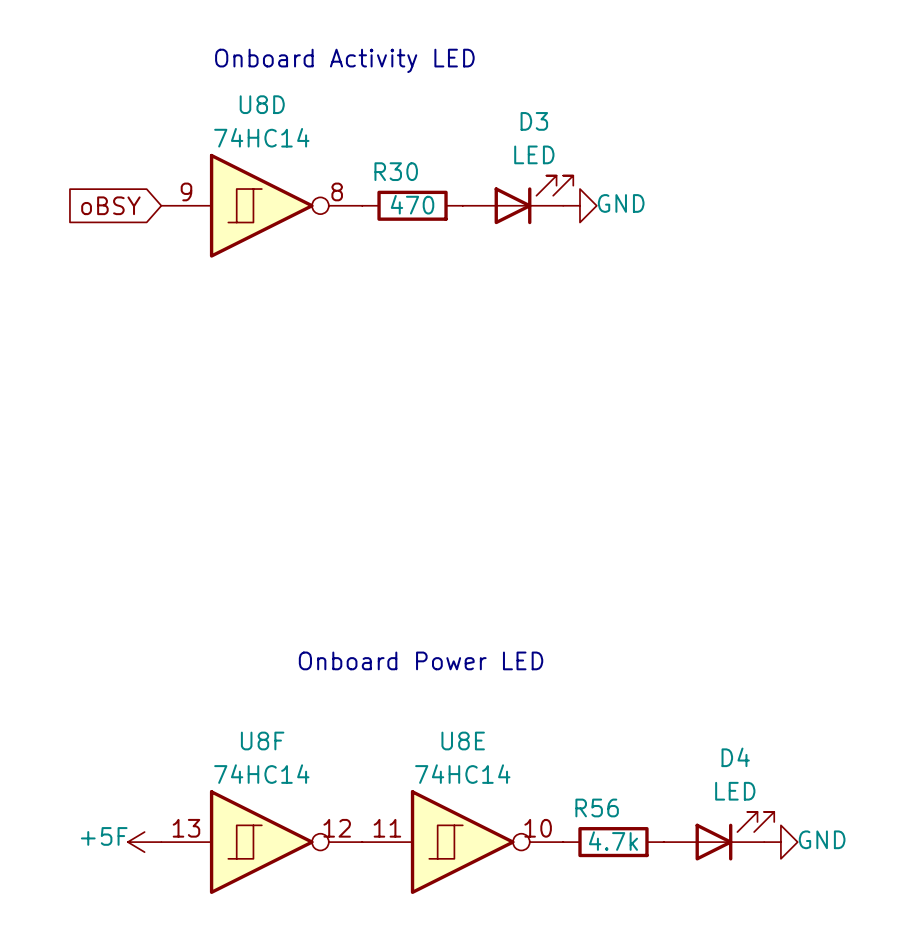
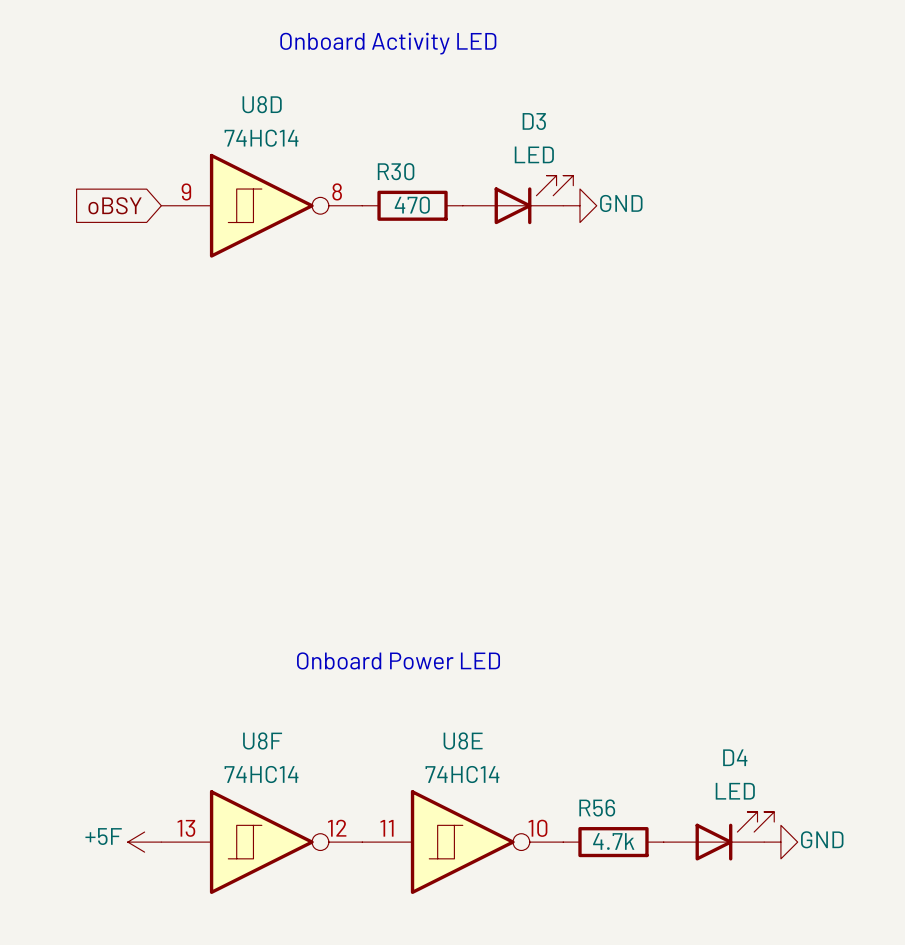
text position: Onboard Activity LED (344, 60) -> Onboard Activity LED (388, 43)

